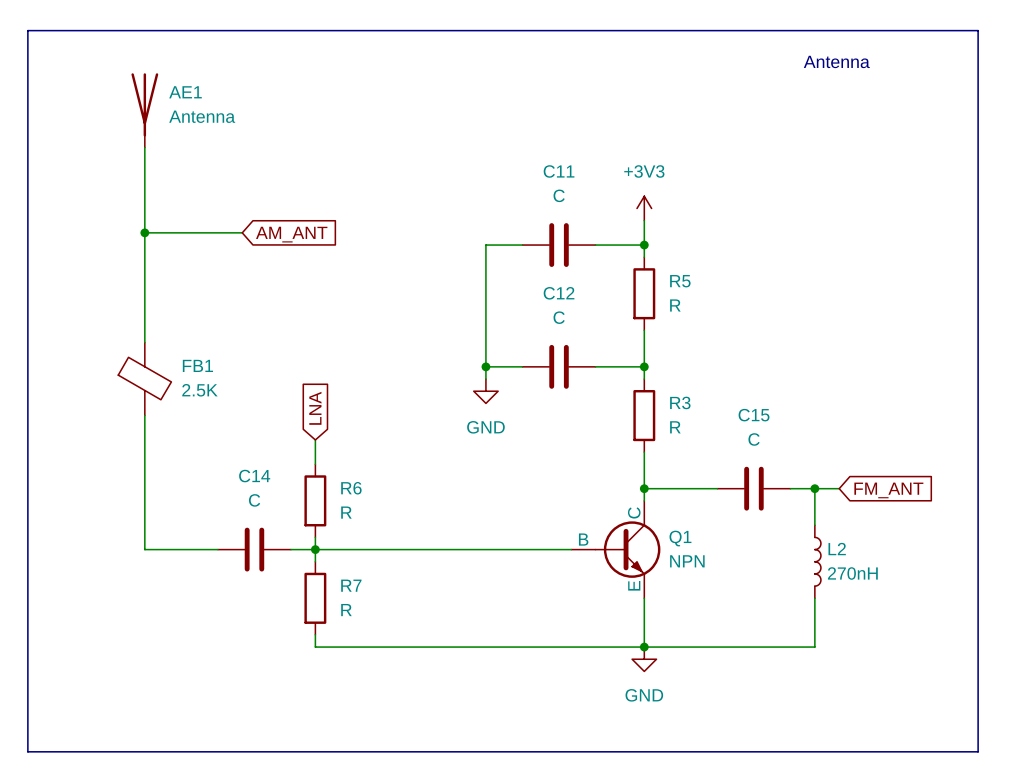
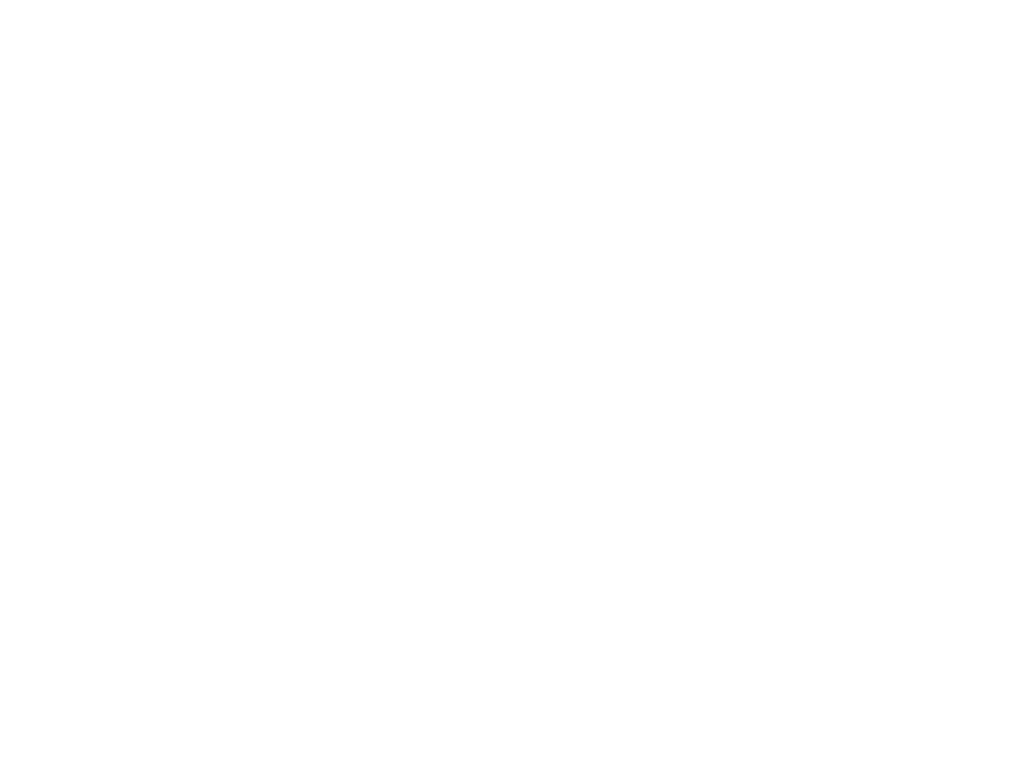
line: (27, 30) (978, 30) (978, 751) (27, 751) (27, 30) -> none
text: Antenna (836, 61) -> none
AE1: Antenna (144, 110) -> none
wire: (144, 147) (144, 342) -> none
power symbol: +3V3 (644, 208) -> none
wire: (644, 220) (644, 257) -> none
wire: (144, 232) (242, 232) -> none
junction: (144, 232) -> none
global label: AM_ANT (291, 234) -> none
wire: (522, 245) (485, 245) (485, 379) -> none
C11: C (559, 245) -> none
wire: (595, 245) (644, 245) -> none
junction: (644, 245) -> none
R5: R (644, 293) -> none
wire: (644, 330) (644, 379) -> none
wire: (485, 366) (522, 366) -> none
junction: (485, 366) -> none
C12: C (559, 366) -> none
wire: (595, 366) (644, 366) -> none
junction: (644, 366) -> none
FB1: 2.5K (144, 379) -> none
power symbol: GND (485, 391) -> none
global label: LNA (315, 408) -> none
wire: (144, 415) (144, 549) (217, 549) -> none
R3: R (644, 415) -> none
wire: (315, 439) (315, 464) -> none
wire: (644, 452) (644, 500) -> none
wire: (644, 488) (717, 488) -> none
junction: (644, 488) -> none
C15: C (753, 488) -> none
wire: (790, 488) (839, 488) -> none
wire: (814, 488) (814, 525) -> none
junction: (814, 488) -> none
global label: FM_ANT (888, 490) -> none
R6: R (315, 500) -> none
wire: (315, 537) (315, 561) -> none
C14: C (254, 549) -> none
wire: (291, 549) (571, 549) -> none
junction: (315, 549) -> none
Q1: NPN (615, 549) -> none
L2: 270nH (817, 561) -> none
R7: R (315, 598) -> none
wire: (644, 598) (644, 647) -> none
wire: (814, 598) (814, 647) (315, 647) (315, 634) -> none
junction: (644, 647) -> none
power symbol: GND (644, 659) -> none

